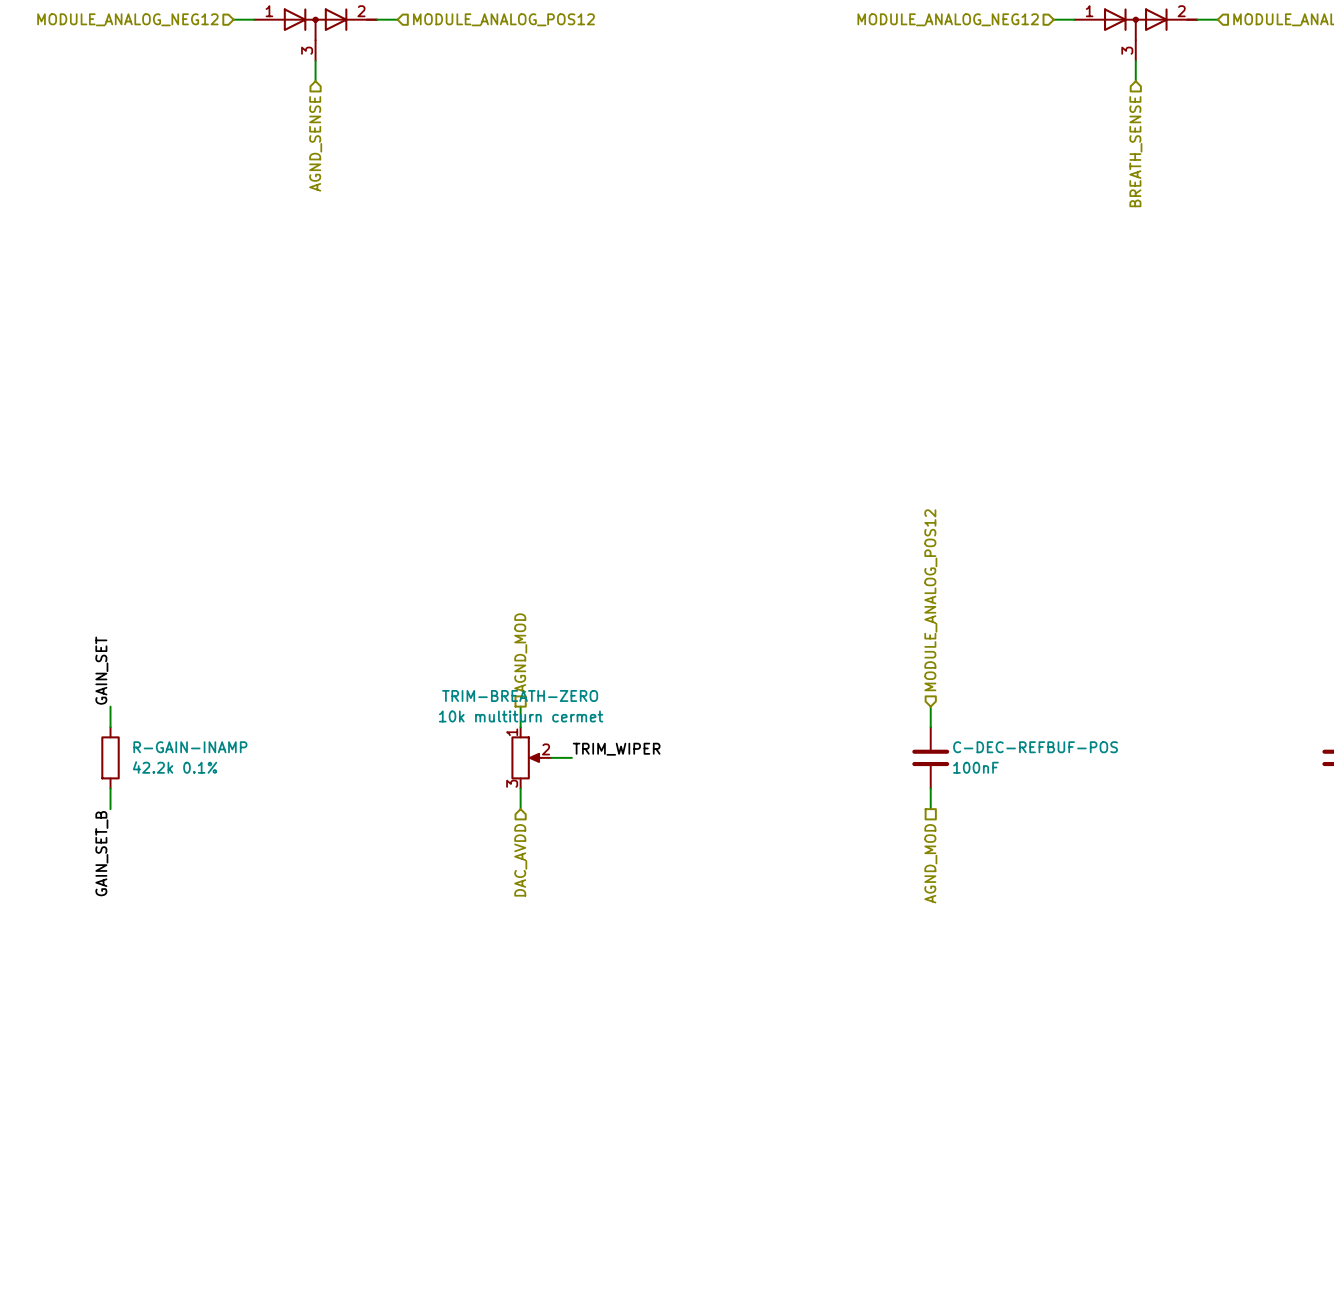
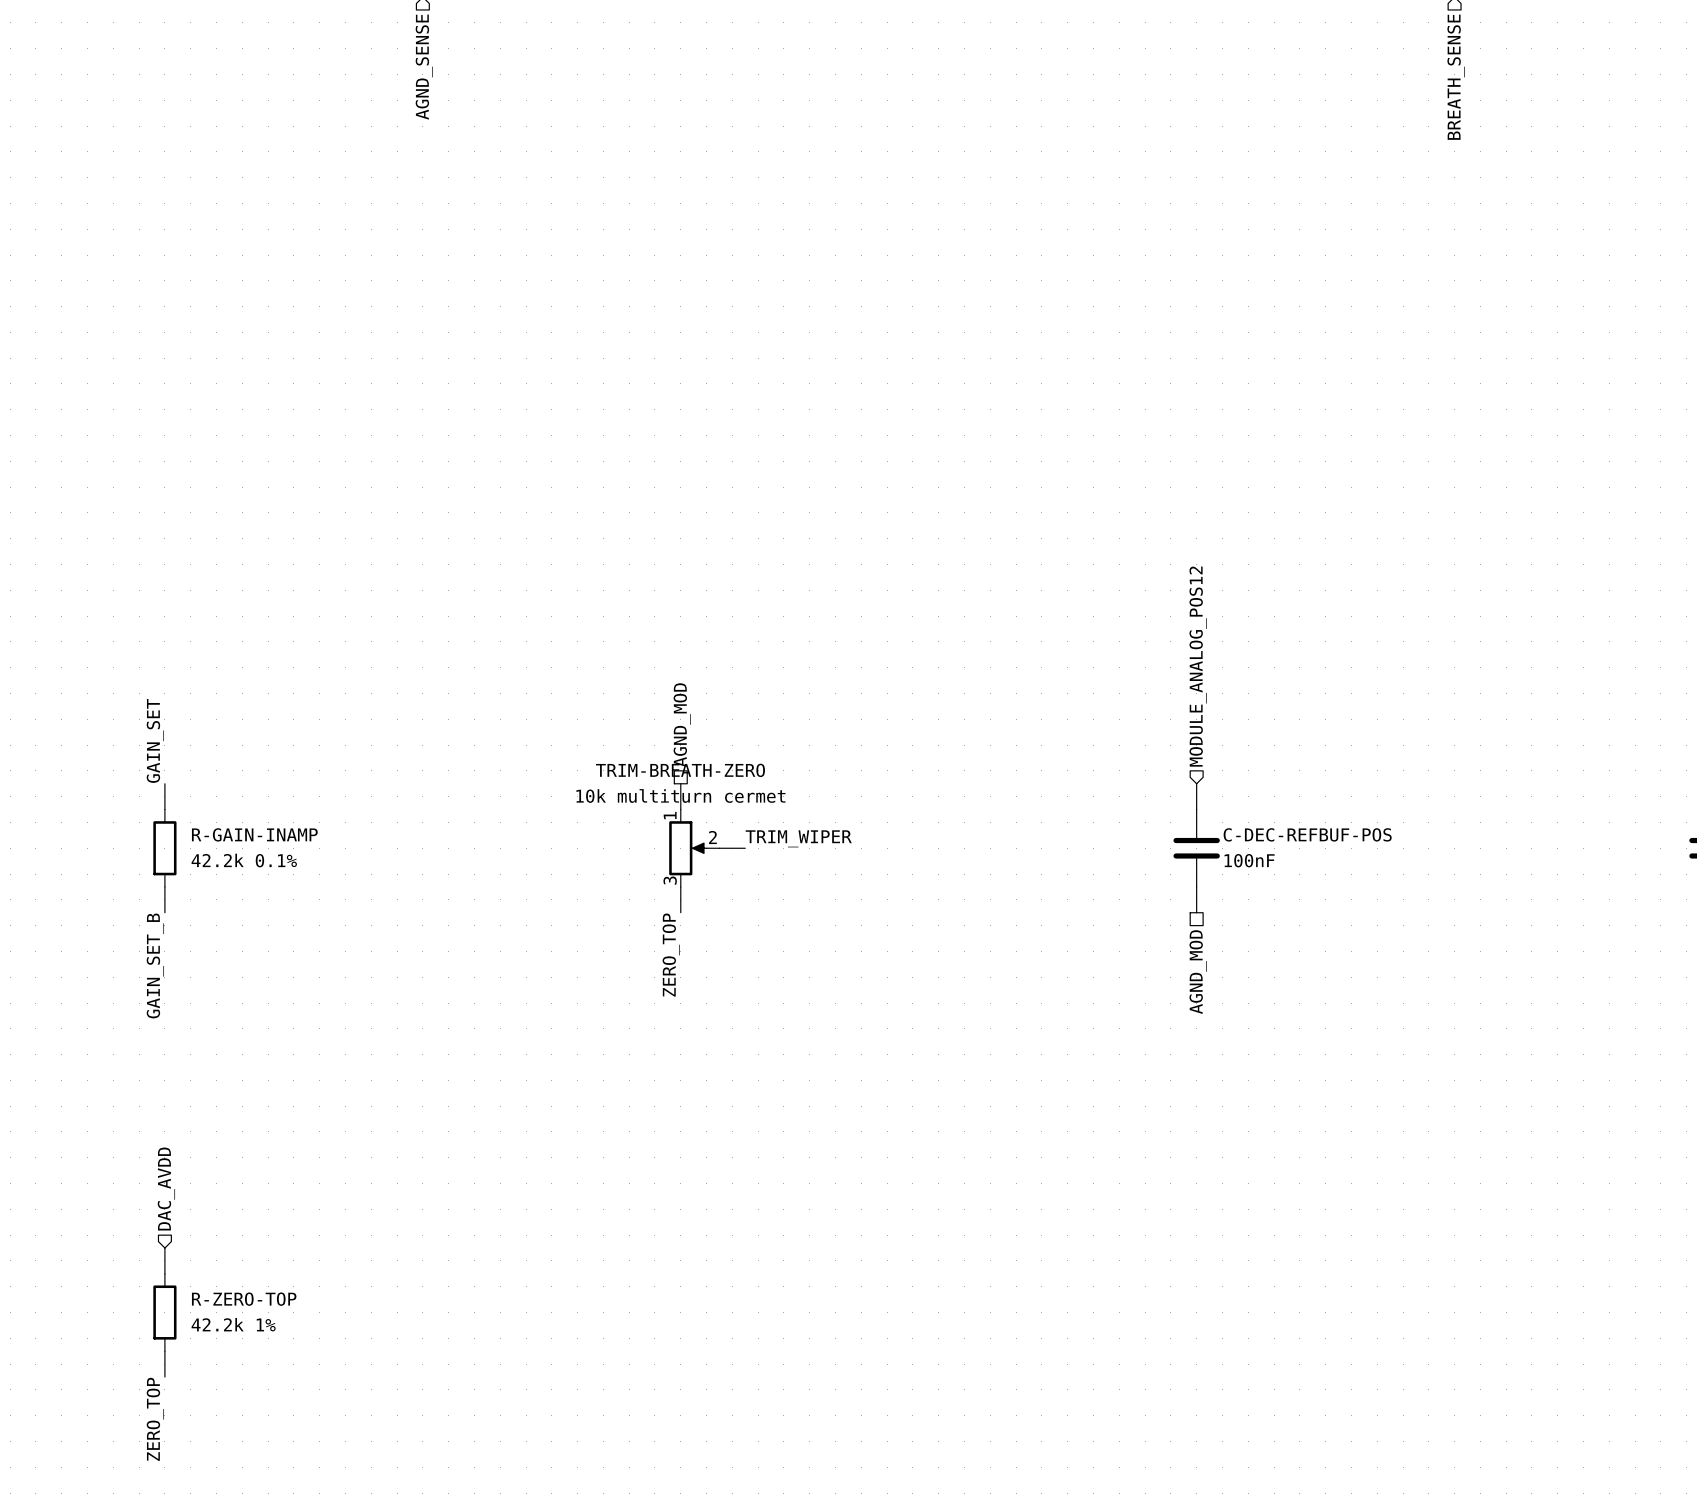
label: none -> ZERO_TOP (671, 955)
hierarchical label: DAC_AVDD (520, 860) -> none
hierarchical label: none -> DAC_AVDD (166, 1189)
wire: none -> (164, 1248) (164, 1273)
R-ZERO-TOP: none -> 42.2k 1% (164, 1312)
wire: none -> (164, 1351) (164, 1377)
label: none -> ZERO_TOP (155, 1419)

